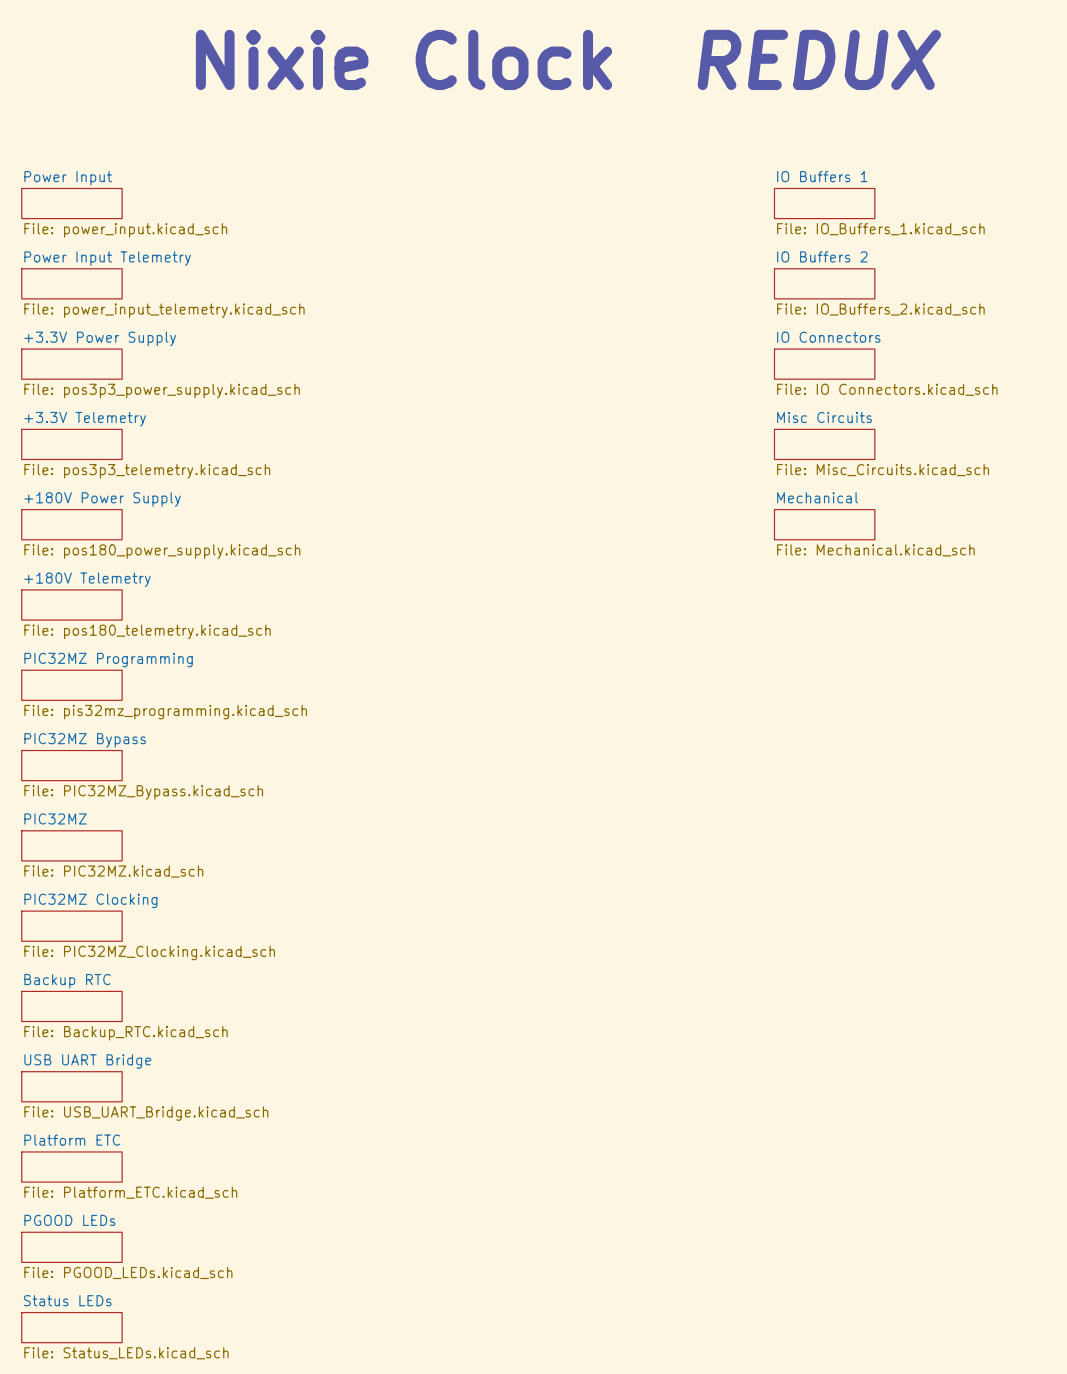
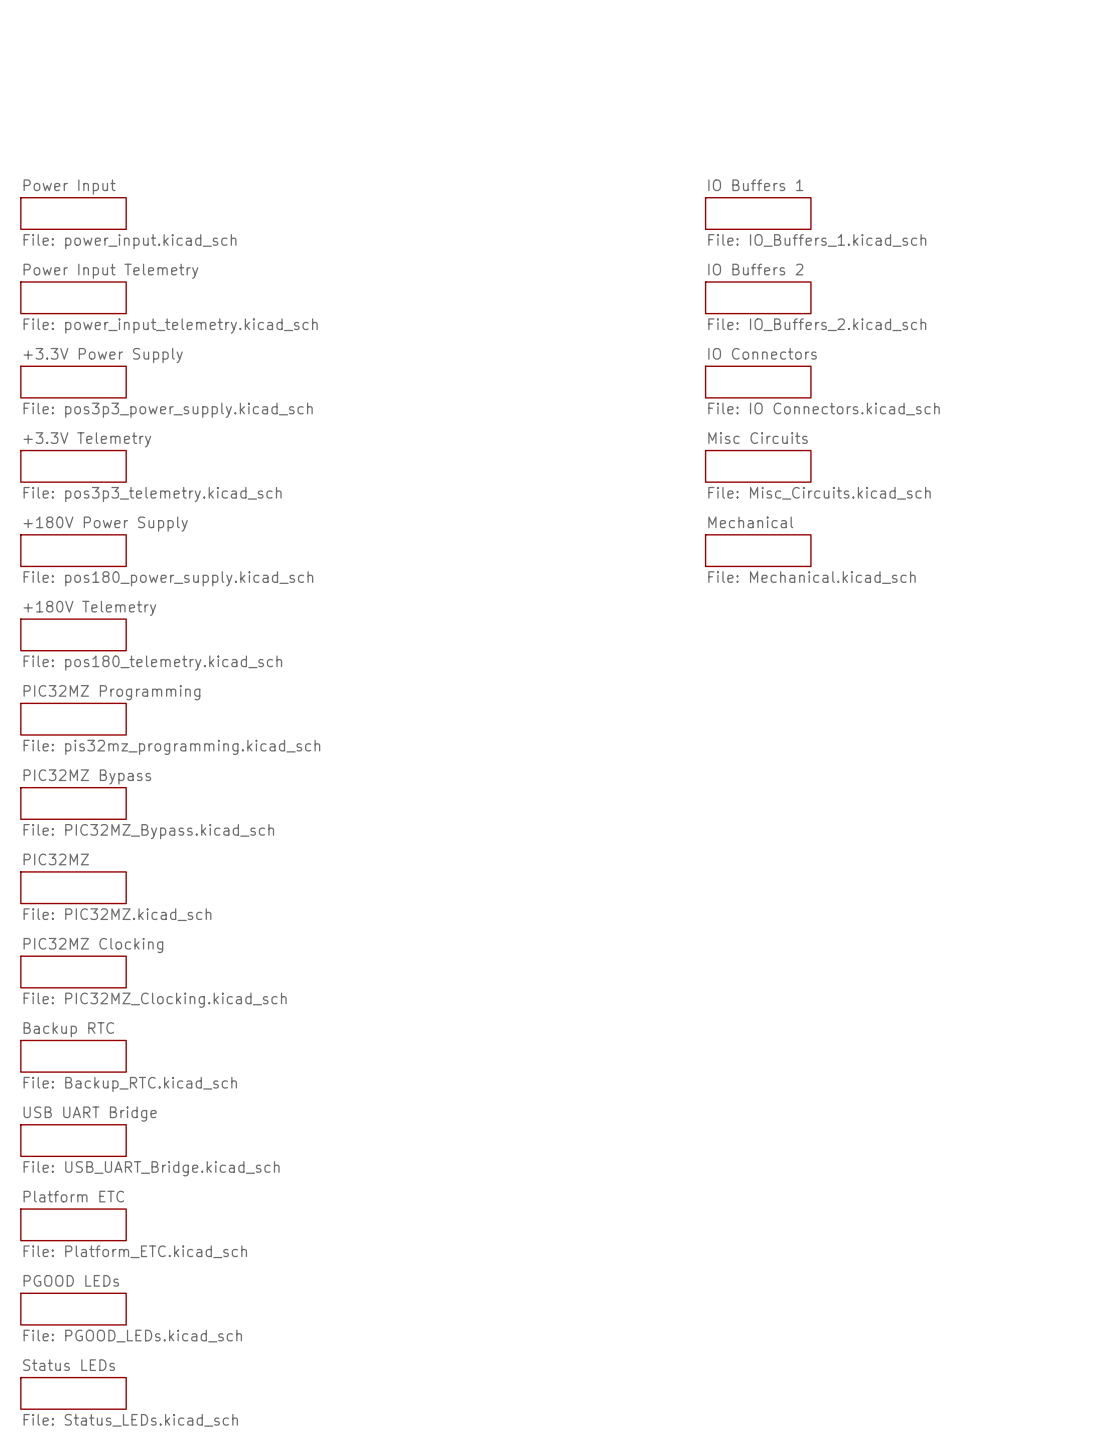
text: Nixie Clock (404, 59) -> none
text: REDUX (819, 59) -> none
sheet IO Buffers 1 position: (824, 203) -> (758, 213)
sheet IO Buffers 2 position: (824, 283) -> (758, 297)
sheet IO Connectors position: (824, 364) -> (758, 382)
sheet Misc Circuits position: (824, 444) -> (758, 466)
sheet Mechanical position: (824, 524) -> (758, 550)

